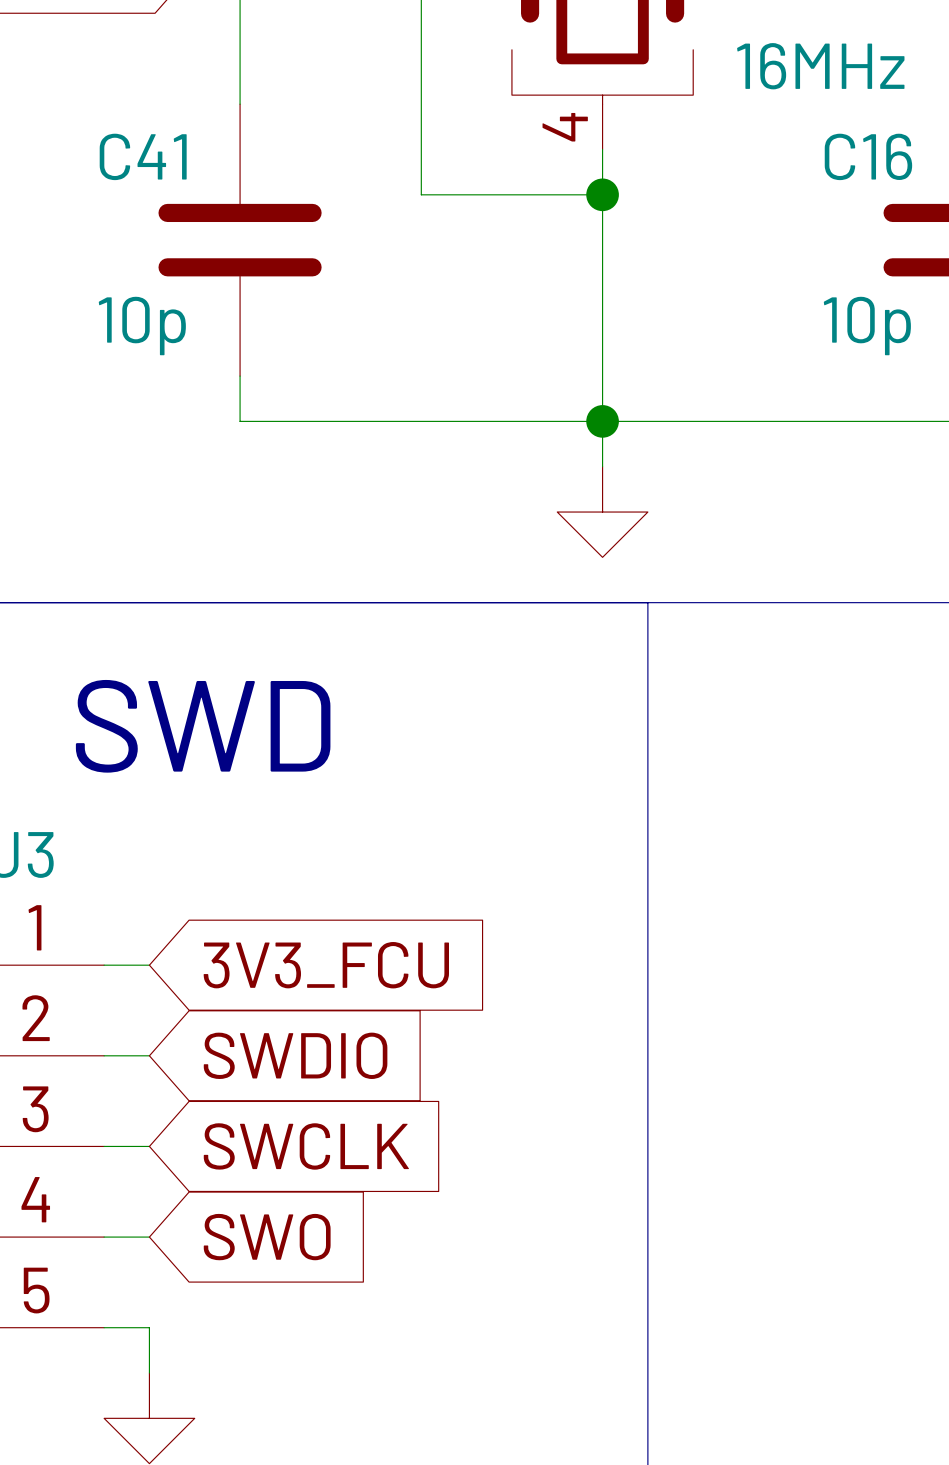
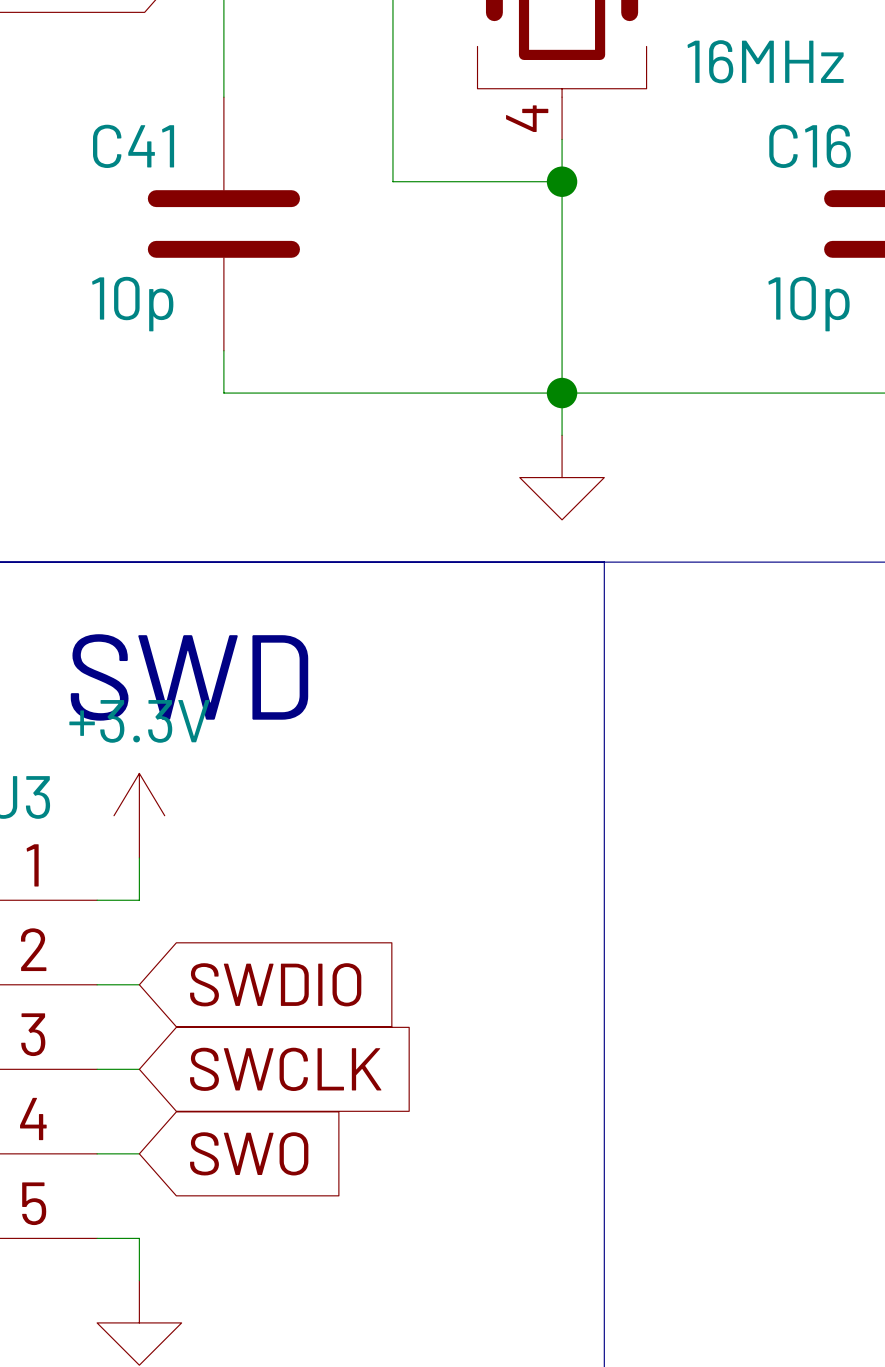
power symbol: none -> +3.3V (139, 815)
wire: none -> (139, 857) (139, 900)
global label: 3V3_FCU (326, 965) -> none

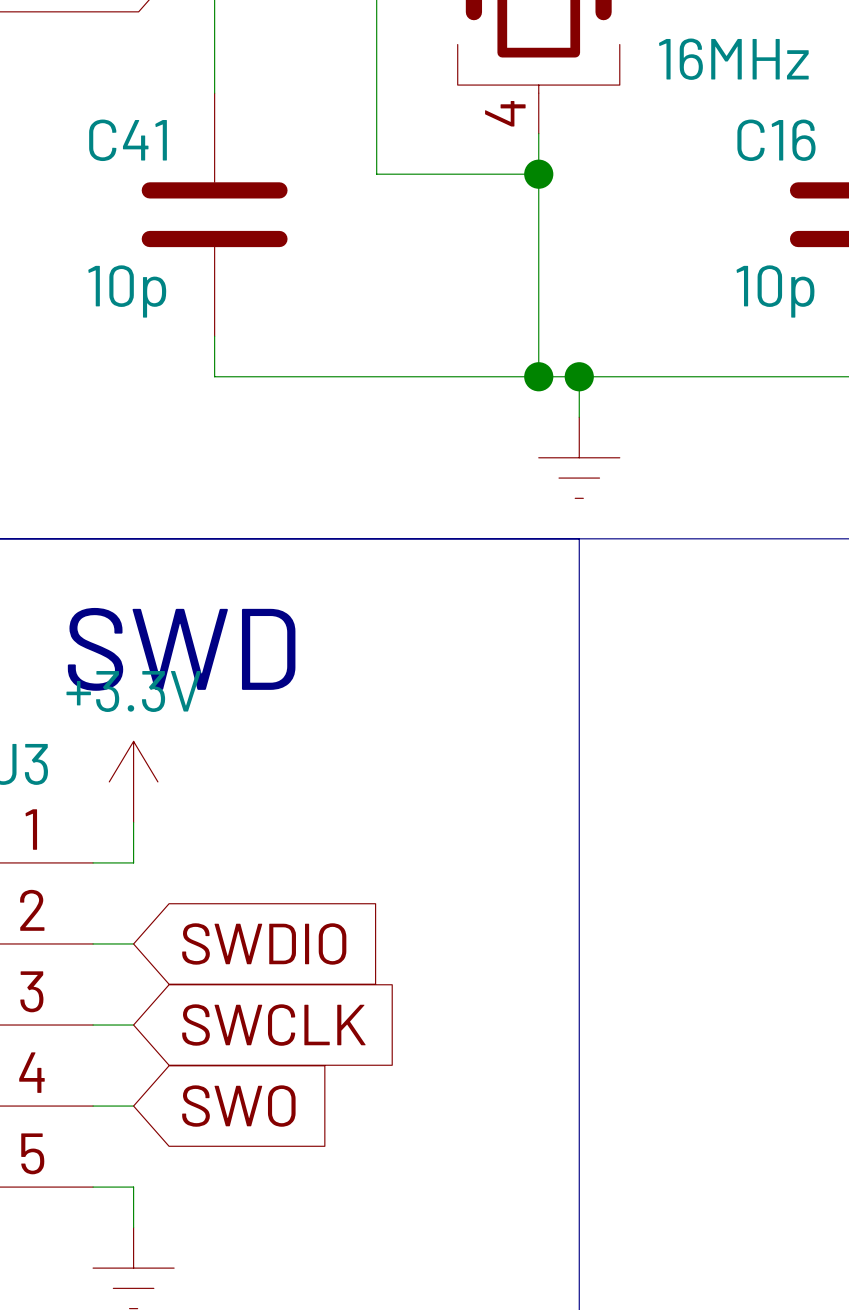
wire: (562, 393) (562, 435) -> (579, 376) (579, 417)
junction: none -> (579, 376)
power symbol: (562, 477) -> none
power symbol: none -> (579, 457)
power symbol shape: [97, 1280, 182, 1366] -> [93, 1227, 175, 1309]

